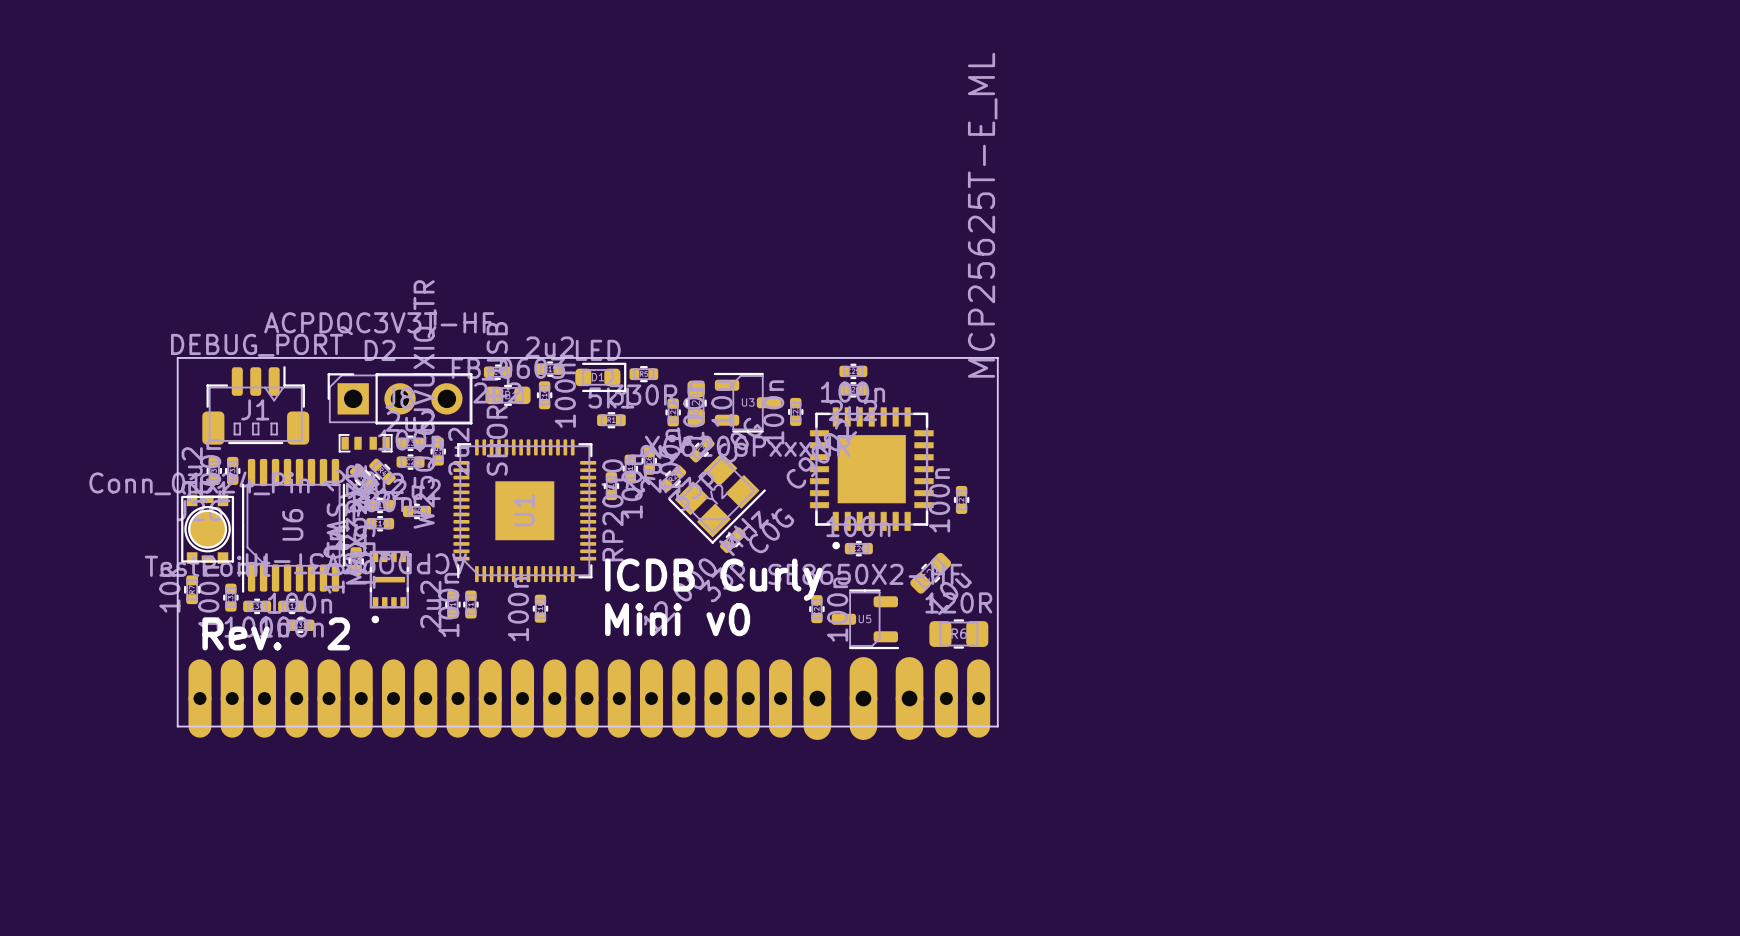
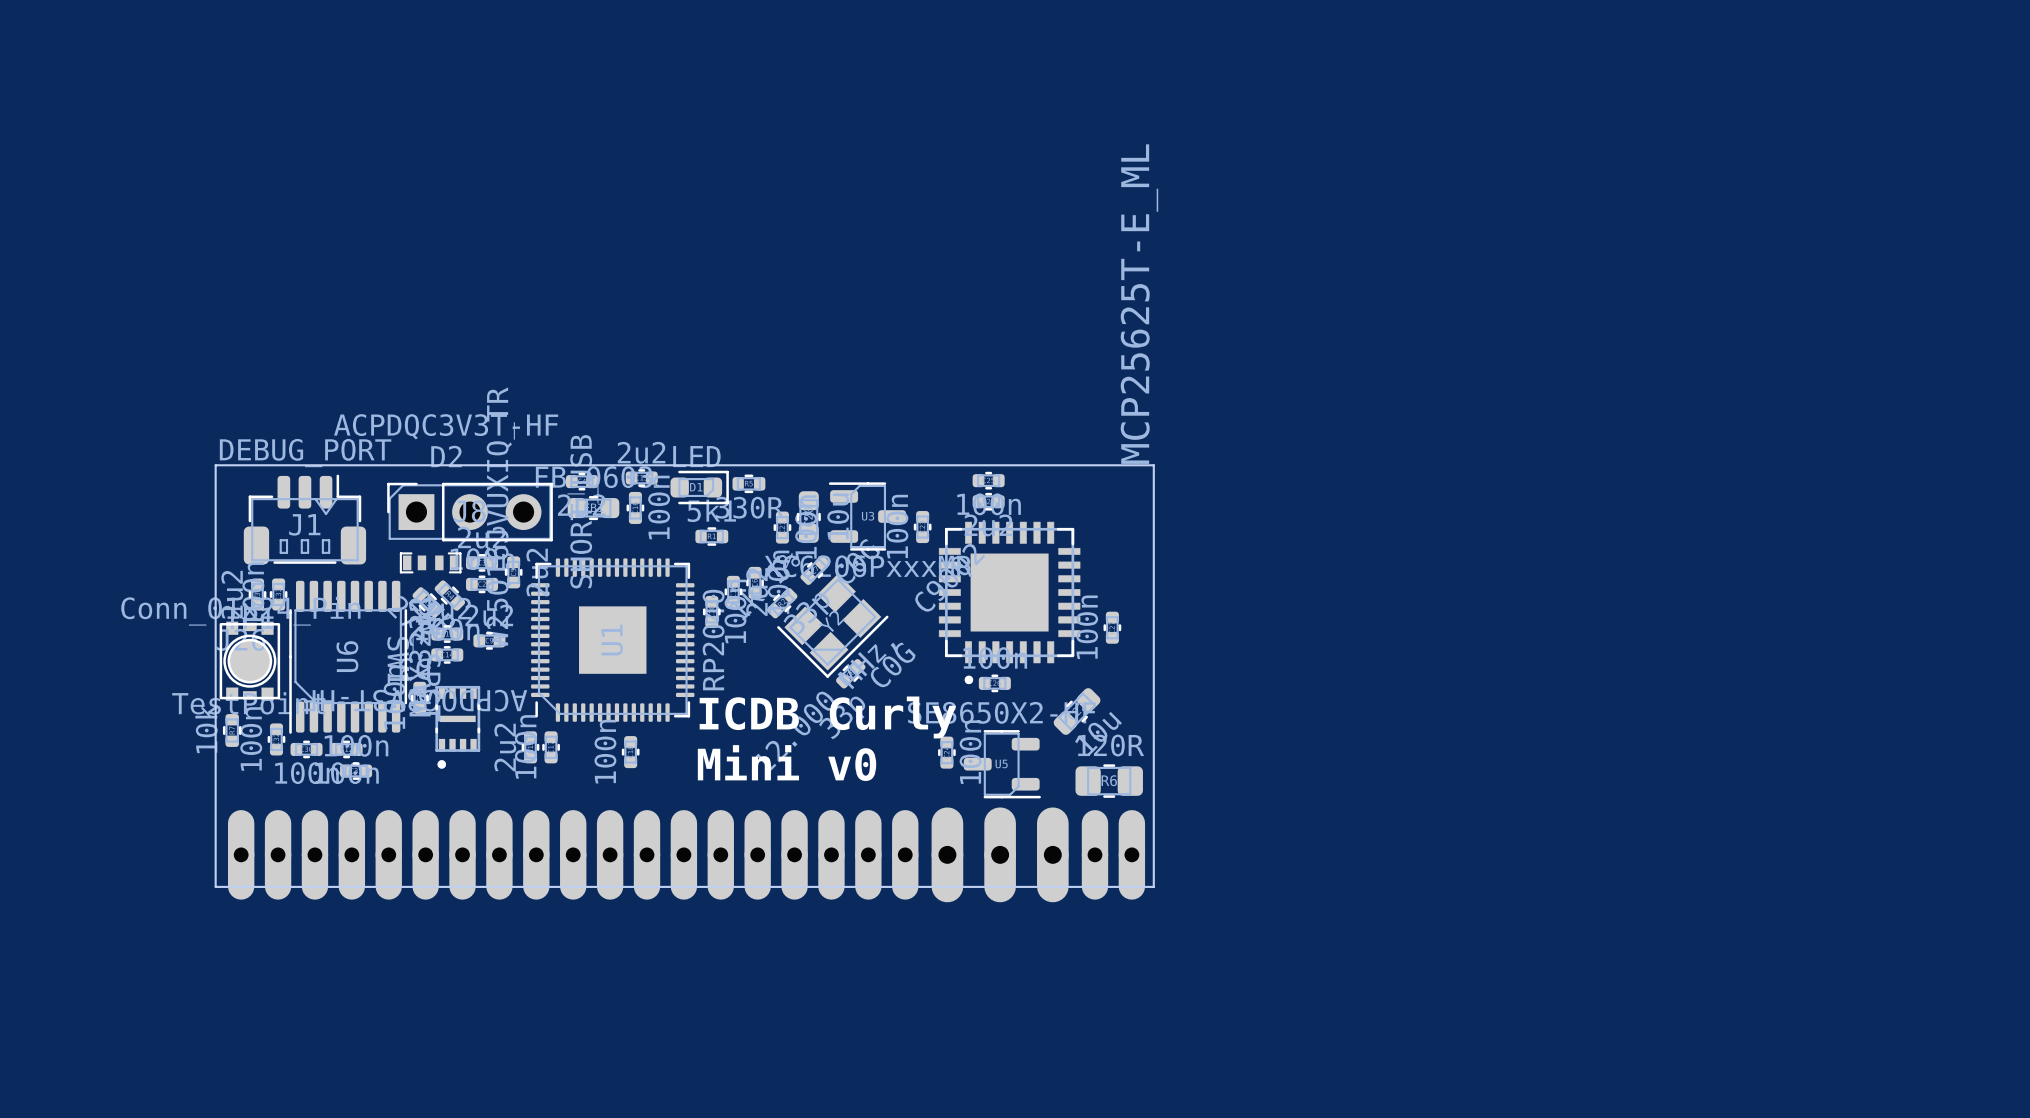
text: Rev. 2 (276, 633) -> none

